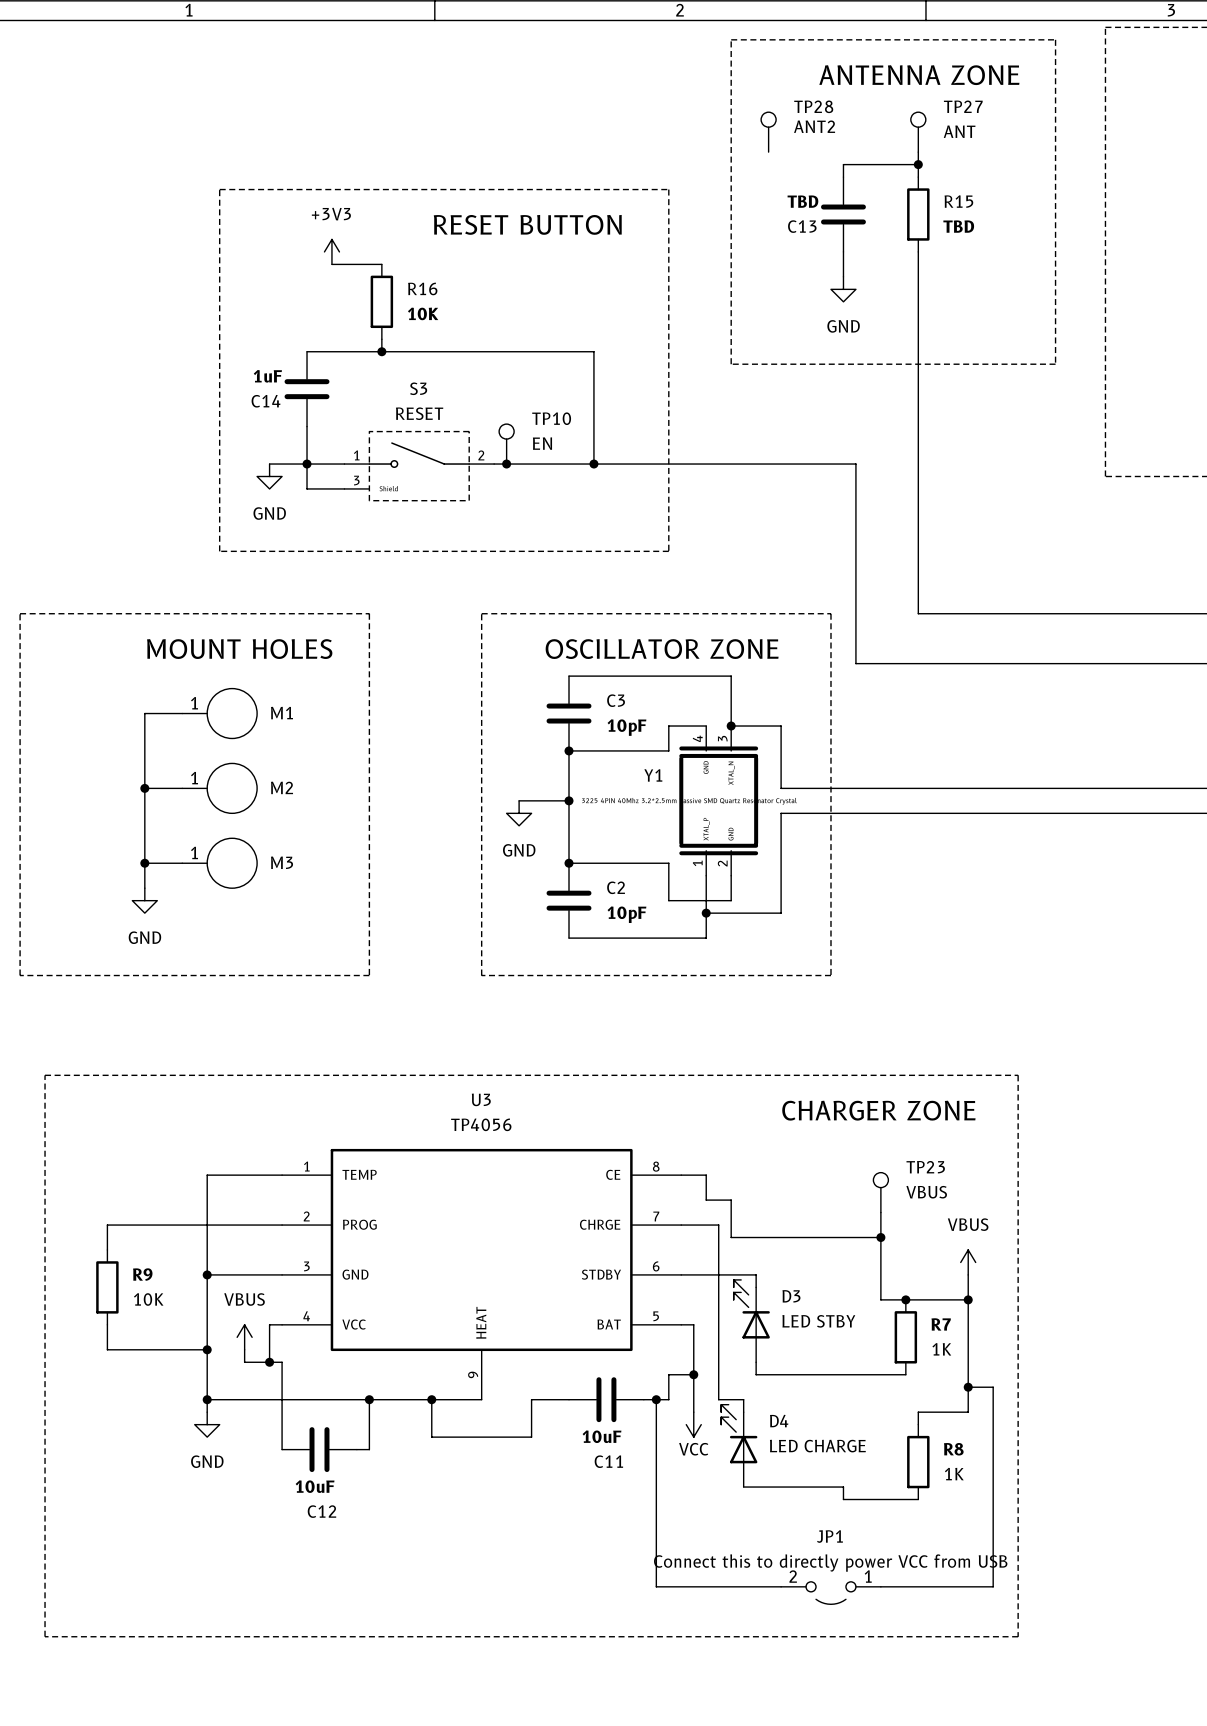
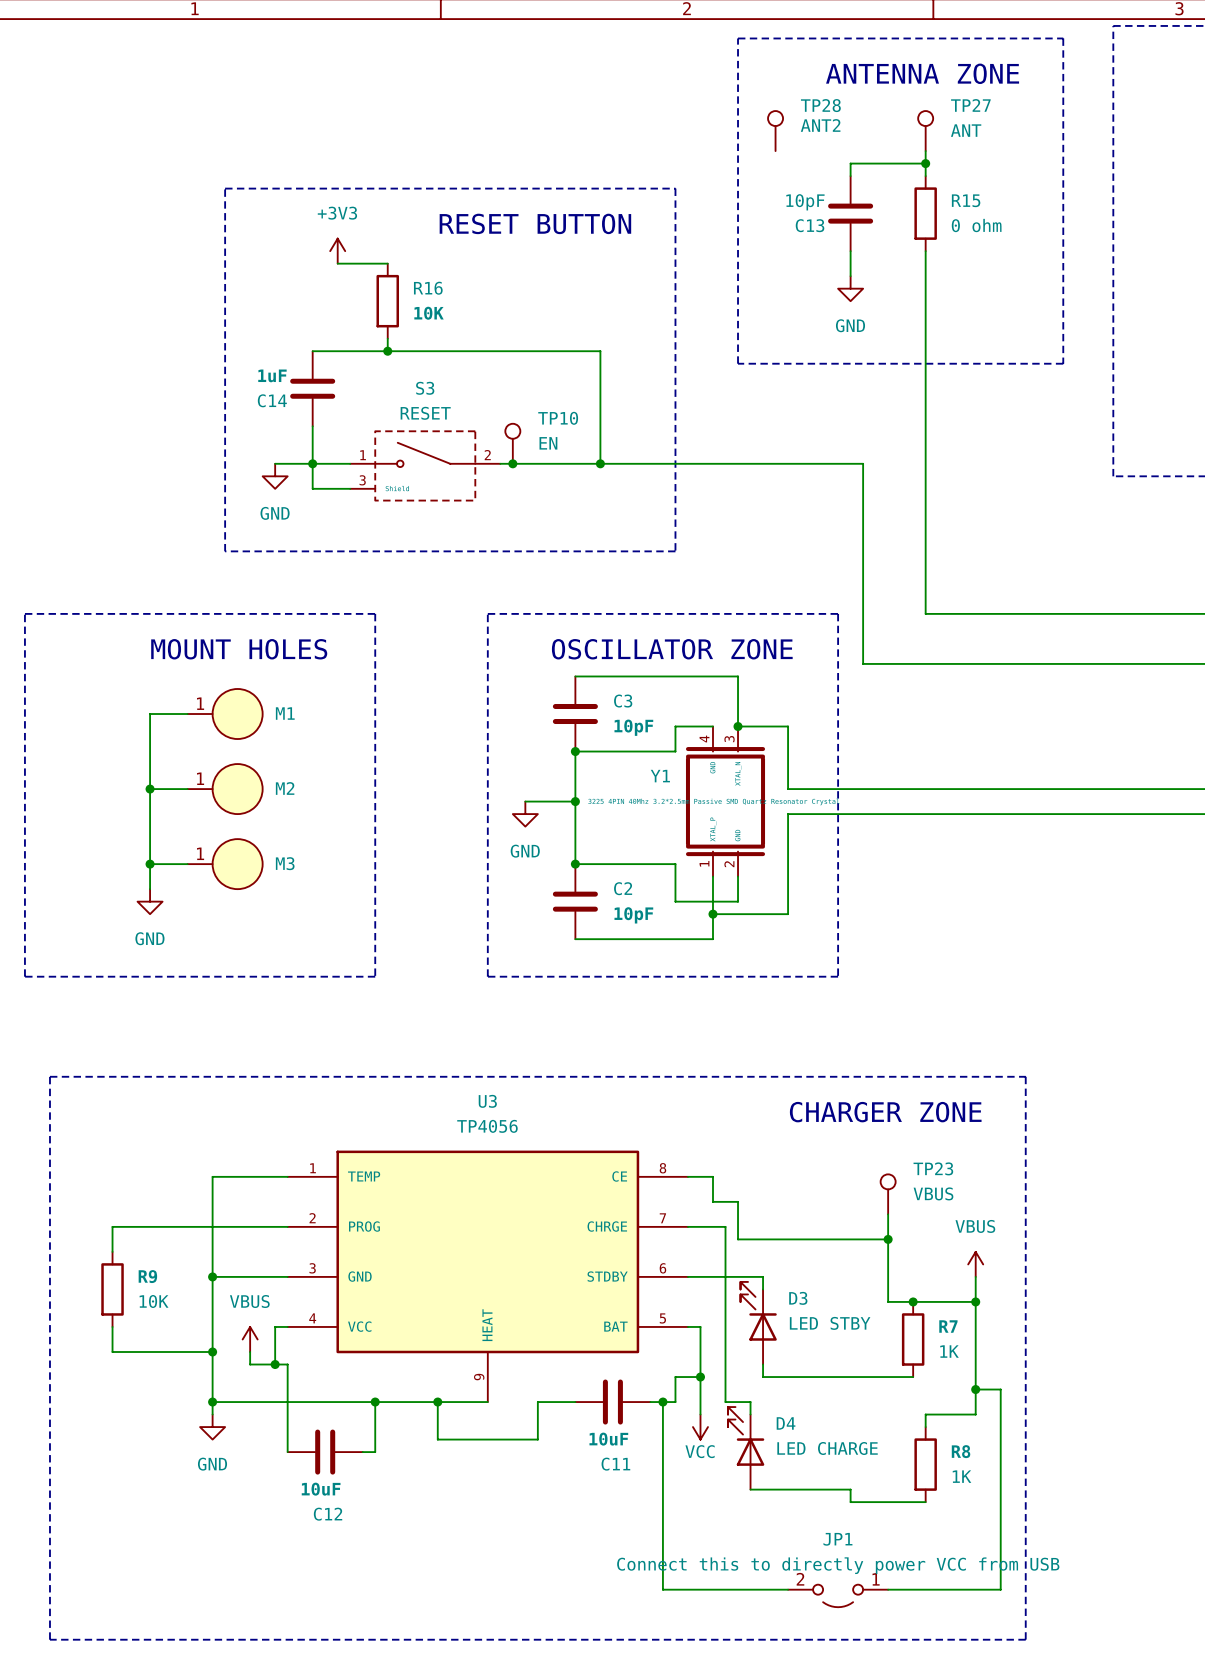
C13 value: TBD (802, 201) -> 10pF (805, 202)
R15 value: TBD (958, 226) -> 0 ohm (976, 225)

